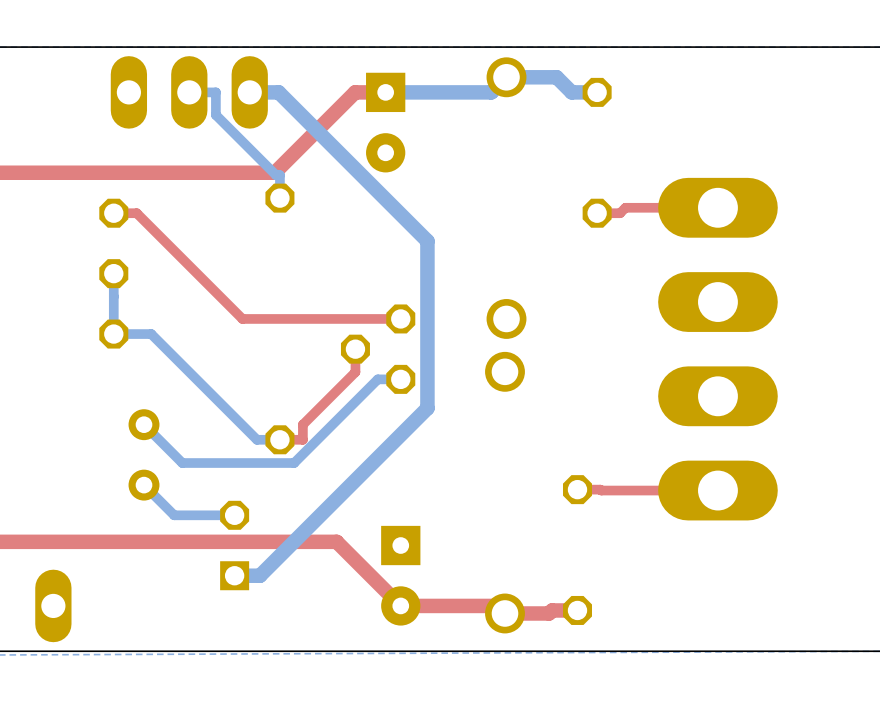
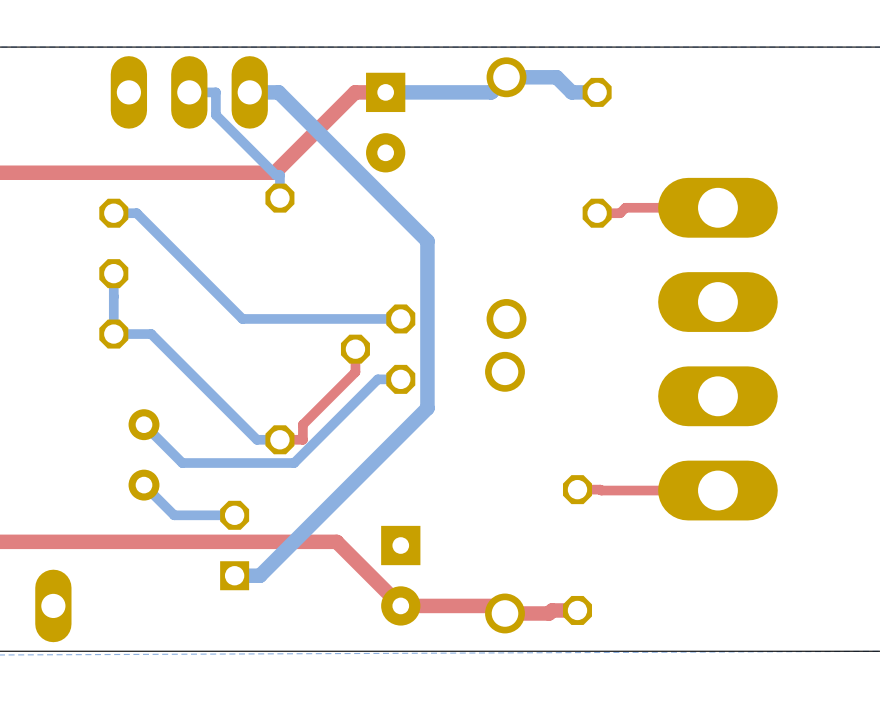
top track: (113, 213) (136, 213) (242, 318) (400, 318) -> none
bottom track: none -> (113, 213) (136, 213) (242, 318) (400, 318)

